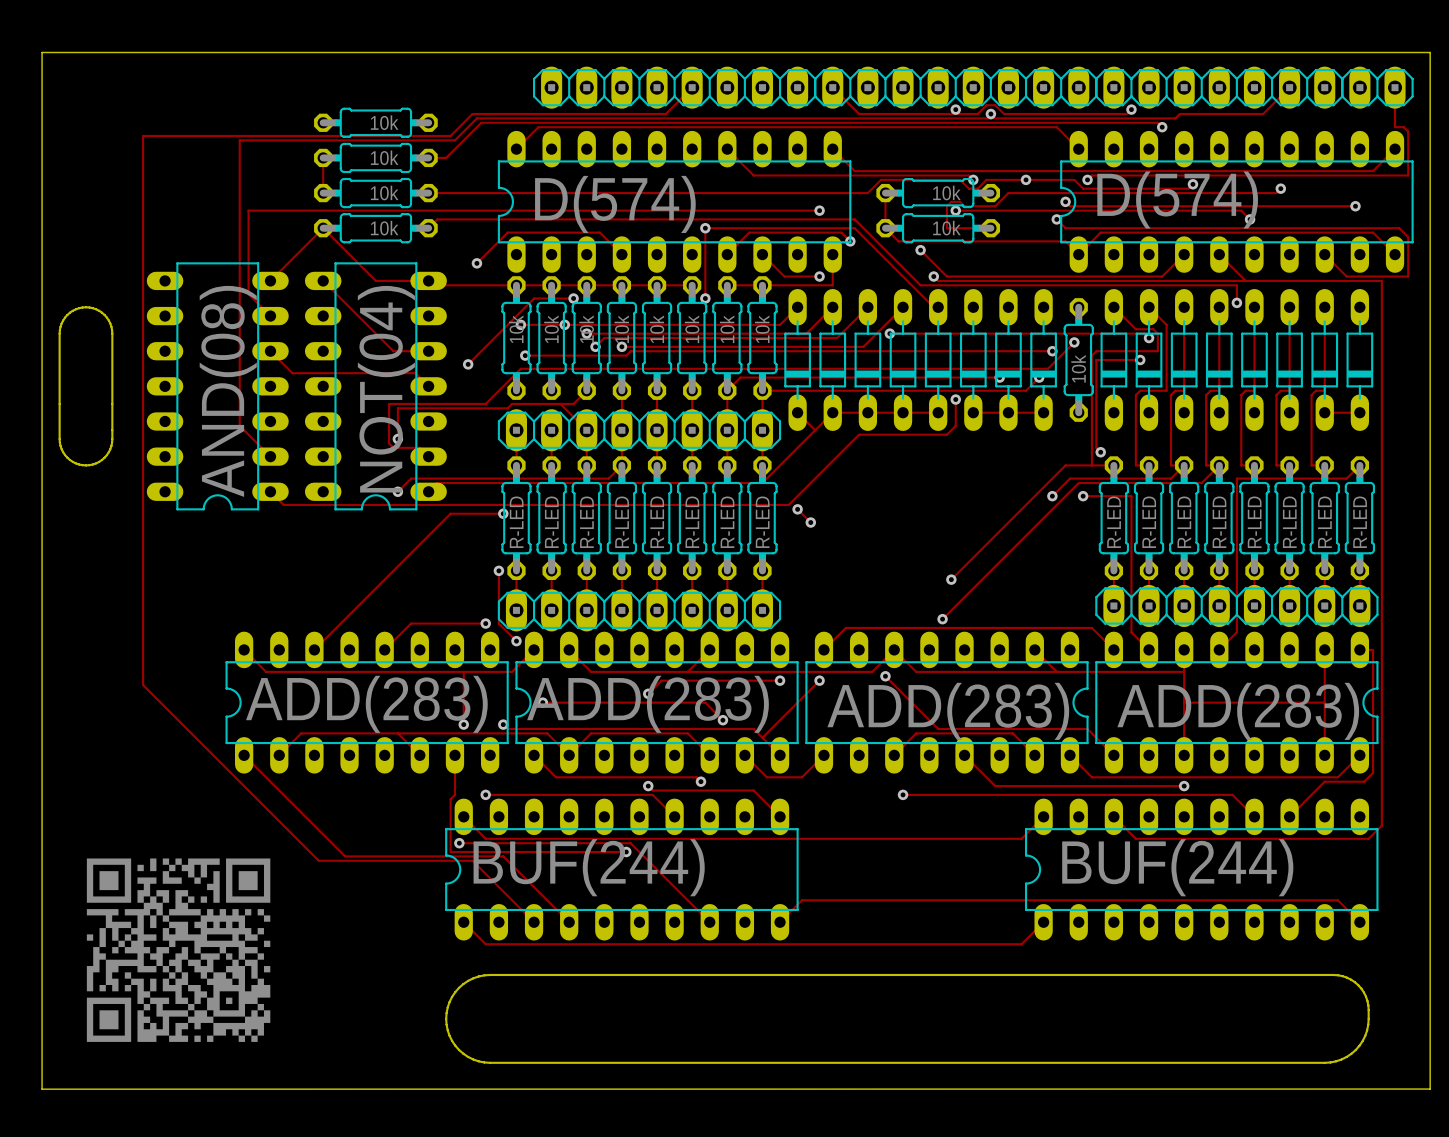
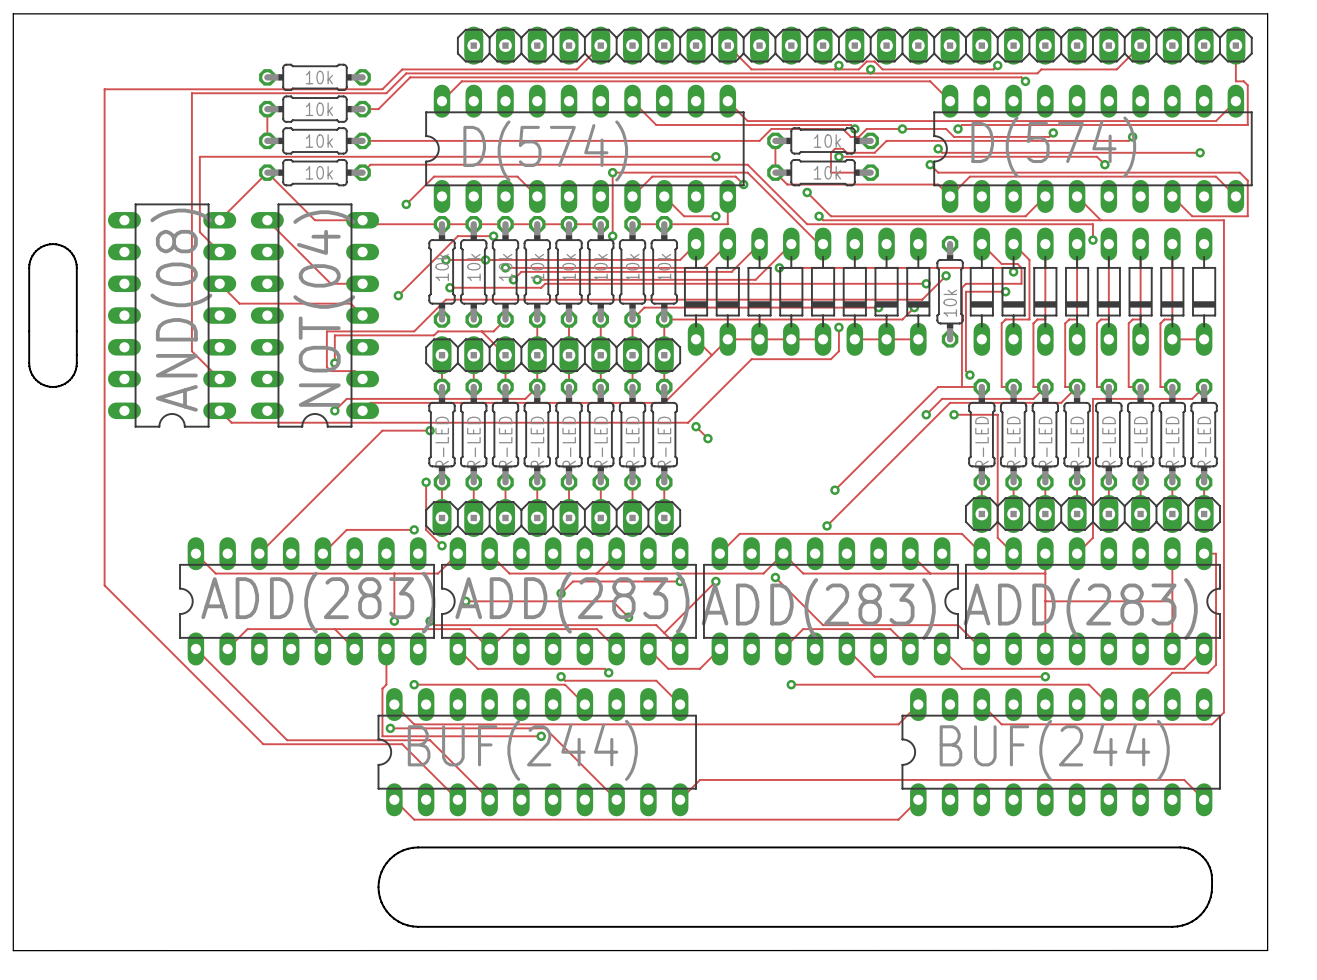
drawing: [86, 858, 271, 1042] -> none

